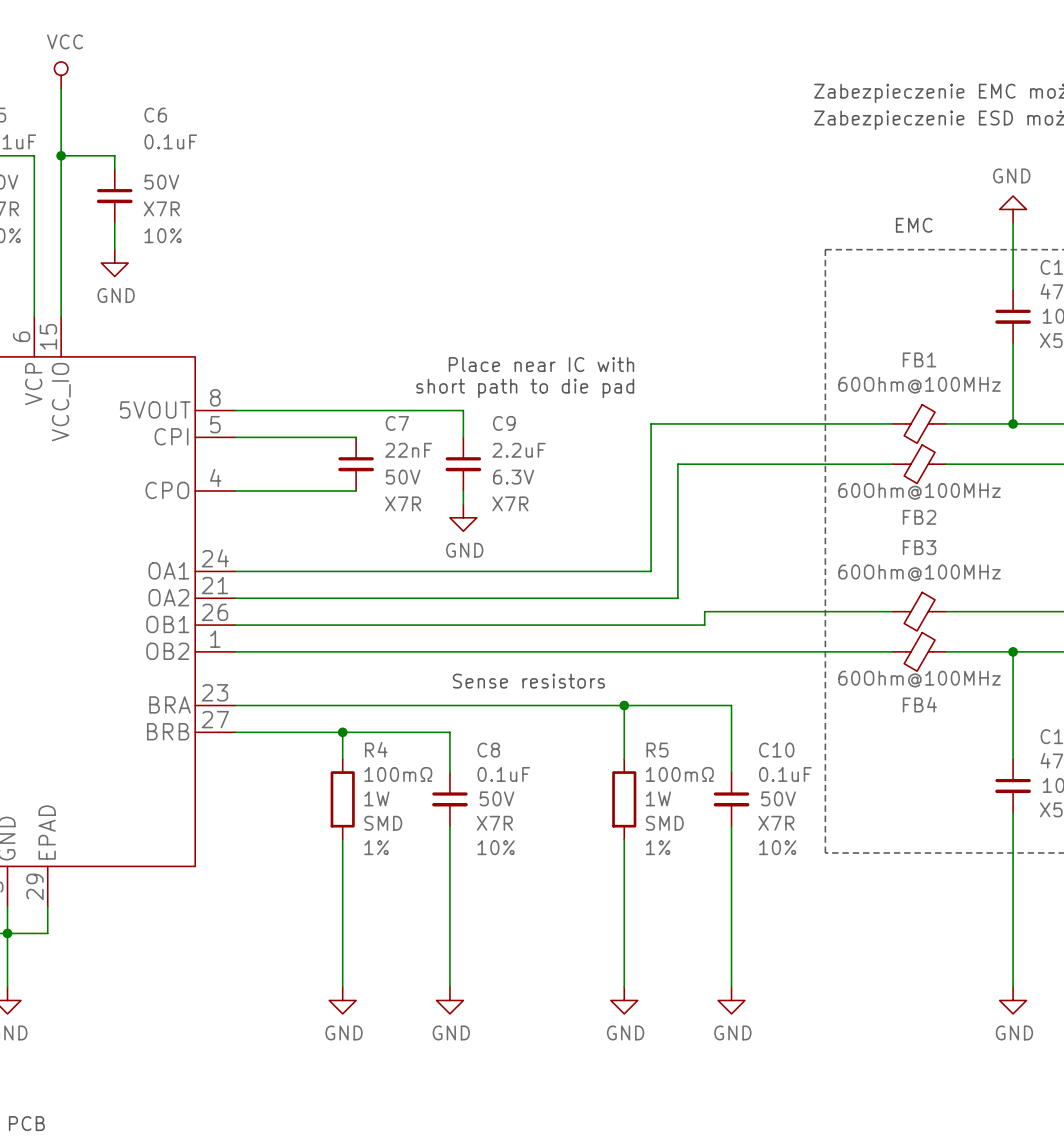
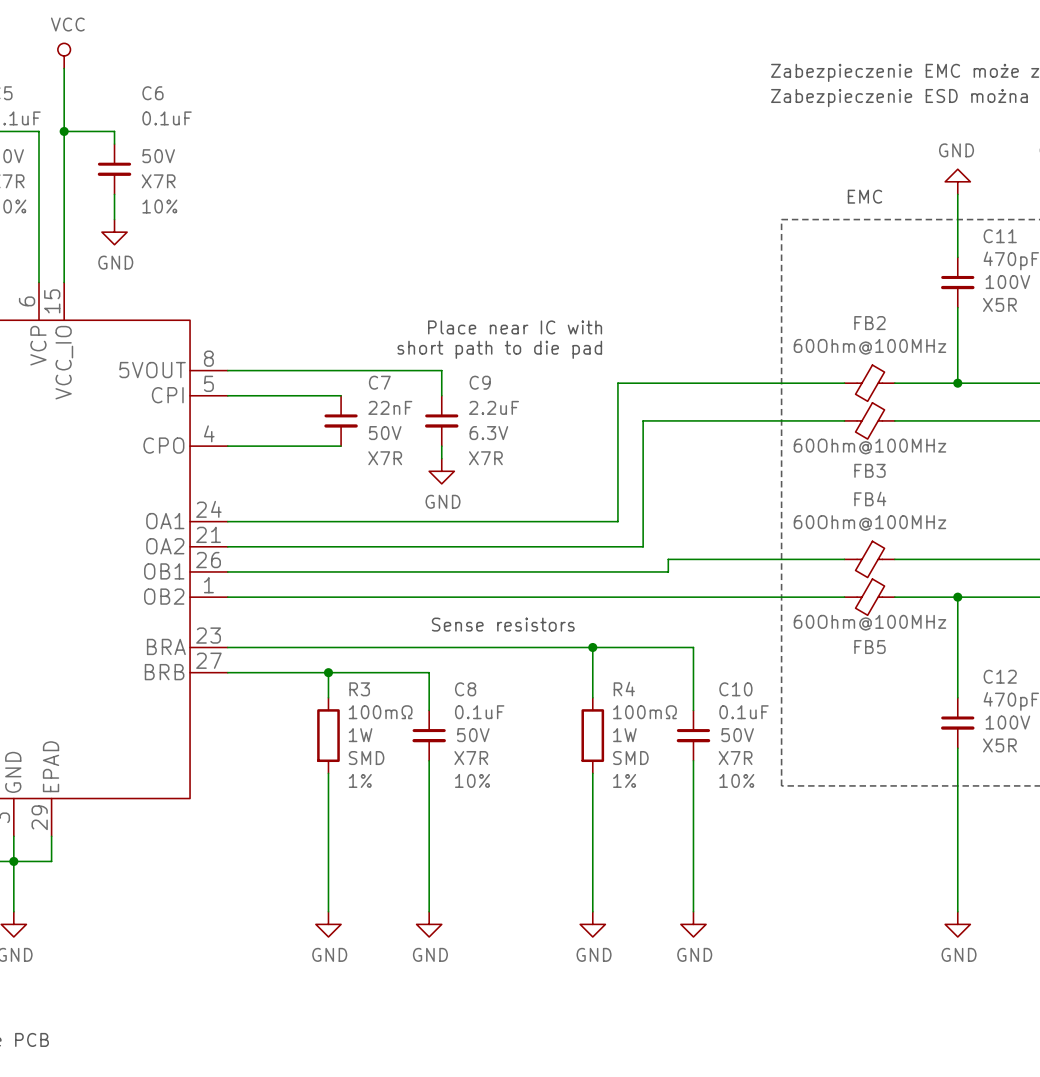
FB1 name: FB1 (919, 359) -> FB2 (869, 323)
FB2 name: FB2 (919, 517) -> FB3 (869, 470)
FB3 name: FB3 (919, 547) -> FB4 (870, 498)
FB4 name: FB4 (919, 704) -> FB5 (869, 647)
R4 name: R4 (376, 749) -> R3 (359, 689)
R5 name: R5 (657, 750) -> R4 (624, 689)

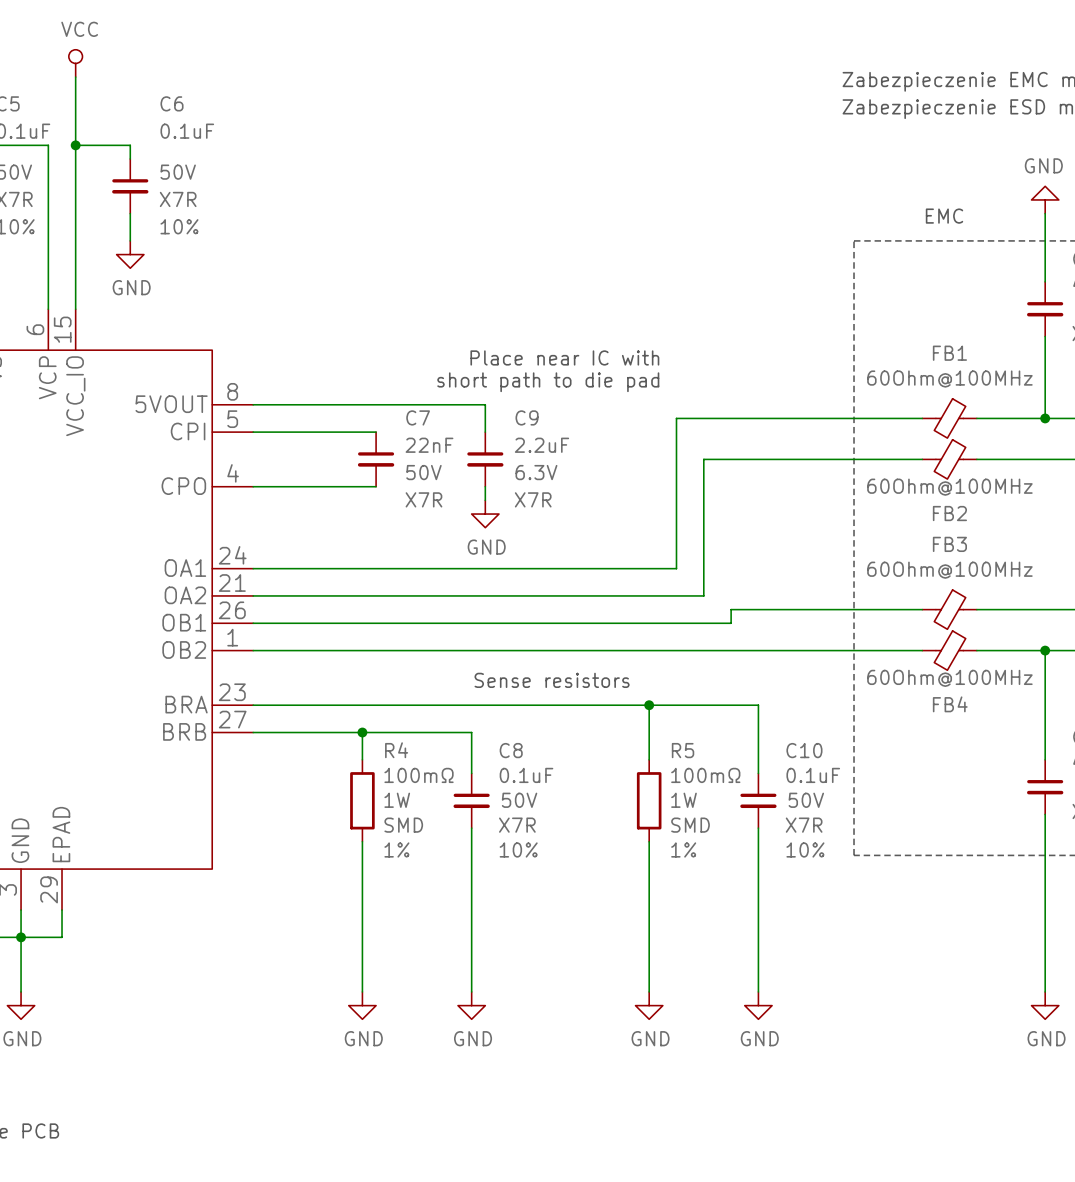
FB2 name: FB2 (869, 323) -> FB1 (949, 353)
FB3 name: FB3 (869, 470) -> FB2 (949, 513)
FB4 name: FB4 (870, 498) -> FB3 (949, 544)
FB5 name: FB5 (869, 647) -> FB4 (950, 704)
R3 name: R3 (359, 689) -> R4 (396, 750)
R4 name: R4 (624, 689) -> R5 (683, 750)

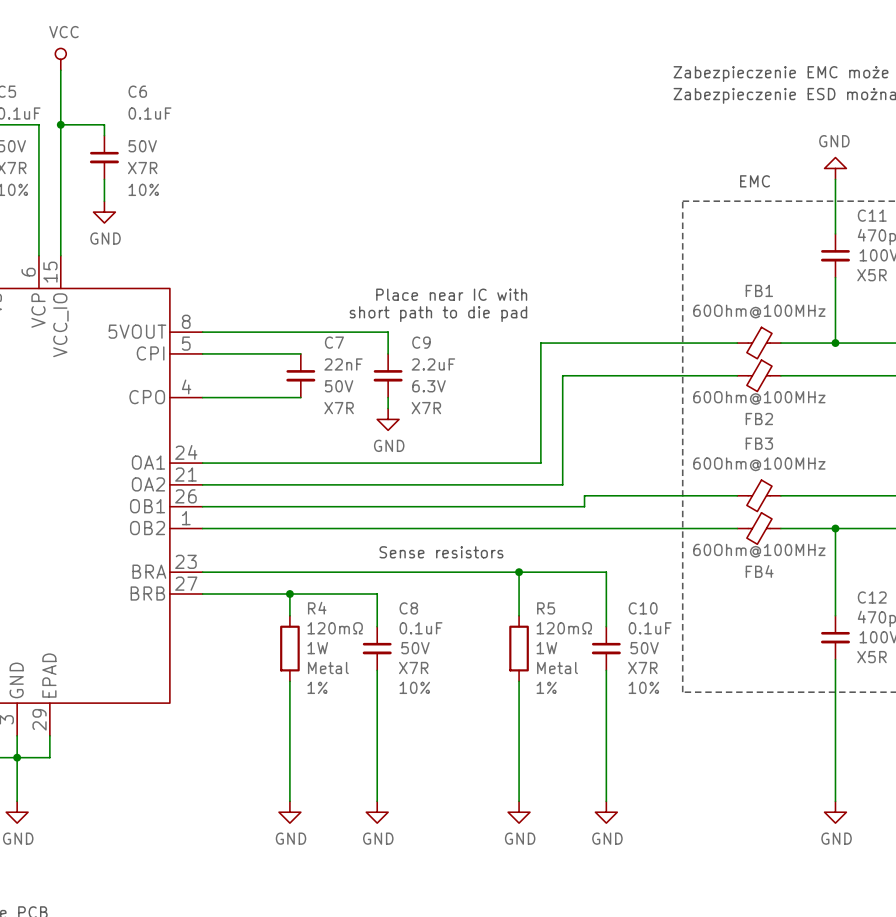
R4 value: 100mΩ (419, 775) -> 120mΩ (335, 628)
R5 value: 100mΩ (705, 775) -> 120mΩ (564, 628)
R4 text: SMD (403, 825) -> Metal (328, 668)
R5 text: SMD (690, 825) -> Metal (557, 668)

